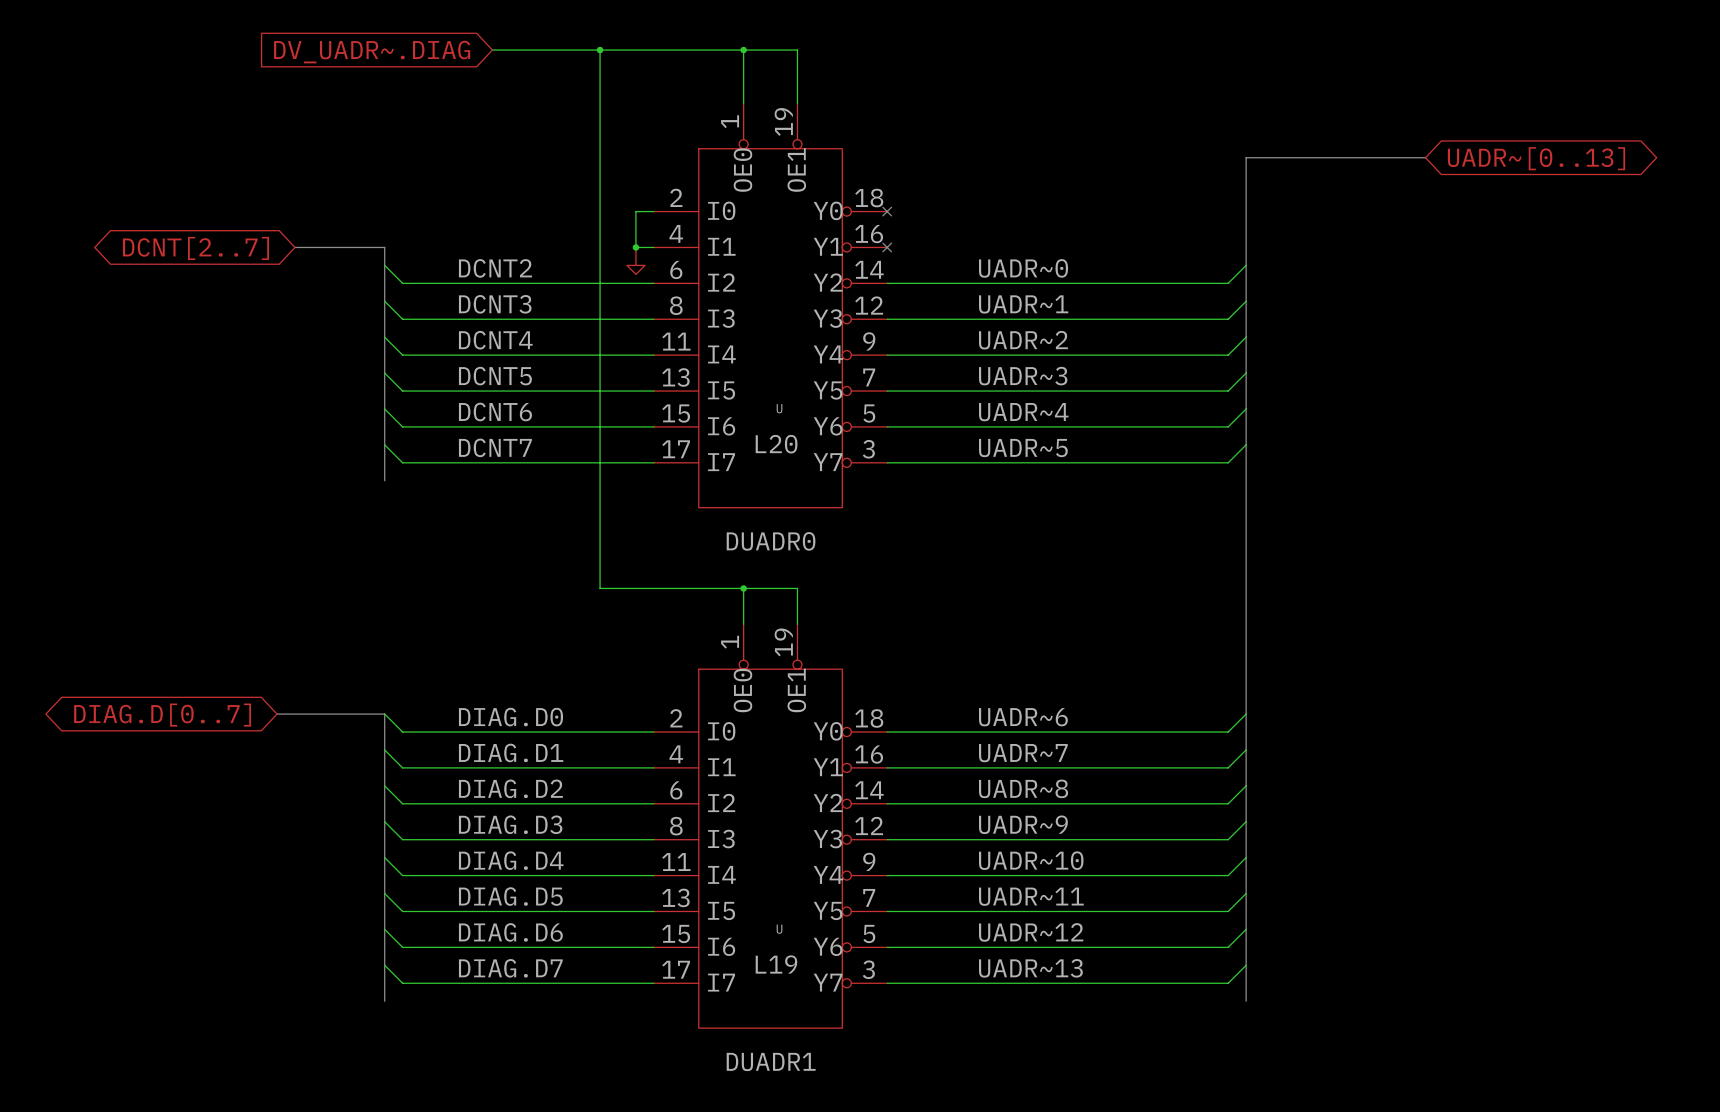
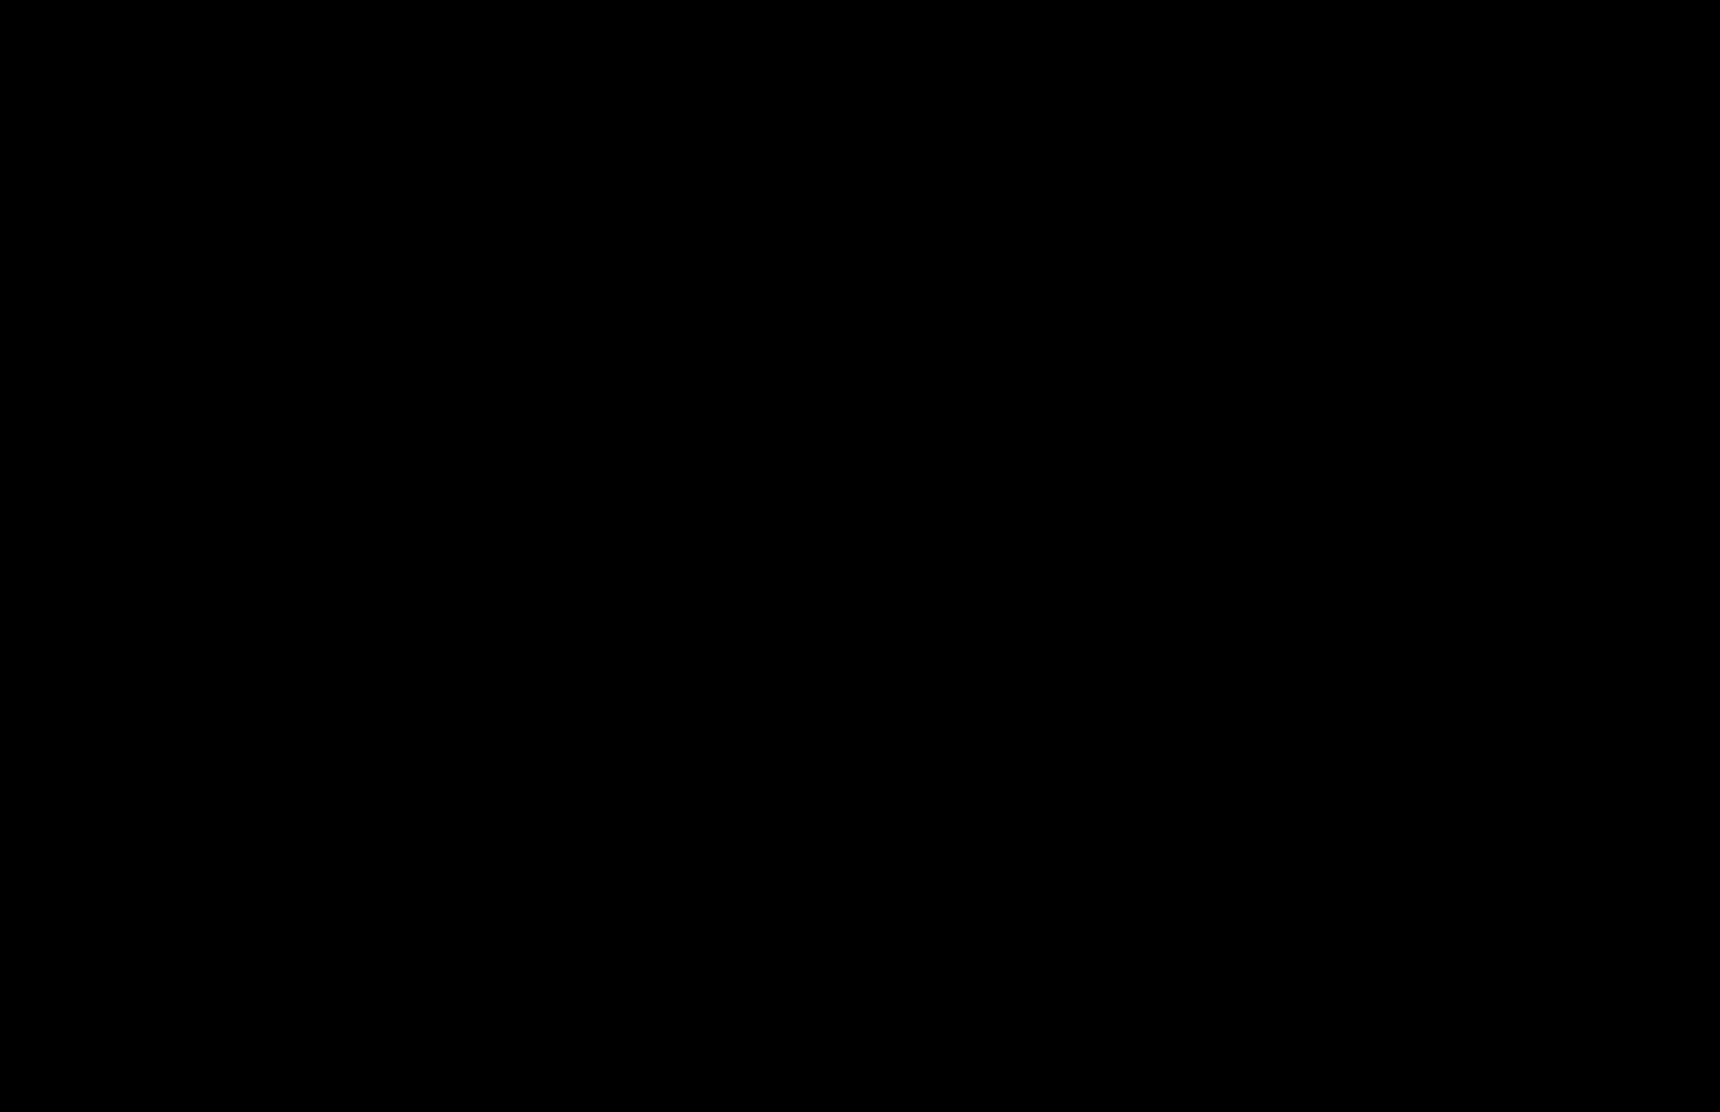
wire: (492, 50) (797, 50) (797, 103) -> none
wire: (600, 50) (600, 588) (797, 588) (797, 624) -> none
junction: (600, 50) -> none
wire: (743, 50) (743, 103) -> none
junction: (743, 50) -> none
global label: DV_UADR~.DIAG (372, 52) -> none
bus: (1425, 157) (1246, 157) (1246, 1001) -> none
global label: UADR~[0..13] (1536, 158) -> none
wire: (653, 211) (635, 211) (635, 247) (653, 247) -> none
no-connect mark: (887, 211) -> none
bus: (294, 247) (384, 247) (384, 480) -> none
junction: (635, 247) -> none
no-connect mark: (887, 247) -> none
global label: DCNT[2..7] (195, 248) -> none
power symbol: (635, 261) -> none
wire: (384, 265) (402, 283) (653, 283) -> none
wire: (1246, 265) (1228, 283) (887, 283) -> none
label: DCNT2 (495, 268) -> none
label: UADR~0 (1023, 268) -> none
wire: (384, 301) (402, 319) (653, 319) -> none
wire: (1246, 301) (1228, 319) (887, 319) -> none
label: DCNT3 (495, 304) -> none
label: UADR~1 (1023, 304) -> none
U: (770, 305) -> none
wire: (384, 337) (402, 355) (653, 355) -> none
wire: (1246, 337) (1228, 355) (887, 355) -> none
label: DCNT4 (495, 340) -> none
label: UADR~2 (1023, 340) -> none
wire: (384, 373) (402, 391) (653, 391) -> none
wire: (1246, 373) (1228, 391) (887, 391) -> none
label: DCNT5 (495, 376) -> none
label: UADR~3 (1023, 376) -> none
wire: (384, 408) (402, 426) (653, 426) -> none
wire: (1246, 408) (1228, 426) (887, 426) -> none
label: DCNT6 (495, 411) -> none
label: UADR~4 (1023, 412) -> none
wire: (384, 444) (402, 462) (653, 462) -> none
wire: (1246, 444) (1228, 462) (887, 462) -> none
label: DCNT7 (495, 447) -> none
label: UADR~5 (1023, 448) -> none
wire: (743, 588) (743, 624) -> none
junction: (743, 588) -> none
bus: (277, 714) (384, 714) (384, 1001) -> none
wire: (384, 714) (402, 732) (653, 732) -> none
wire: (1246, 714) (1228, 732) (887, 732) -> none
global label: DIAG.D[0..7] (162, 715) -> none
label: DIAG.D0 (510, 717) -> none
label: UADR~6 (1023, 717) -> none
wire: (384, 749) (402, 767) (653, 767) -> none
wire: (1246, 749) (1228, 767) (887, 767) -> none
label: DIAG.D1 (511, 752) -> none
label: UADR~7 (1023, 753) -> none
wire: (384, 785) (402, 803) (653, 803) -> none
wire: (1246, 785) (1228, 803) (887, 803) -> none
label: DIAG.D2 (510, 788) -> none
label: UADR~8 (1023, 788) -> none
wire: (384, 821) (402, 839) (653, 839) -> none
wire: (1246, 821) (1228, 839) (887, 839) -> none
label: DIAG.D3 (510, 824) -> none
label: UADR~9 (1023, 824) -> none
U: (770, 826) -> none
wire: (384, 857) (402, 875) (653, 875) -> none
wire: (1246, 857) (1228, 875) (887, 875) -> none
label: DIAG.D4 (511, 860) -> none
label: UADR~10 (1031, 860) -> none
wire: (384, 893) (402, 911) (653, 911) -> none
wire: (1246, 893) (1228, 911) (887, 911) -> none
label: DIAG.D5 (510, 896) -> none
label: UADR~11 (1031, 896) -> none
wire: (384, 929) (402, 947) (653, 947) -> none
wire: (1246, 929) (1228, 947) (887, 947) -> none
label: DIAG.D6 (510, 932) -> none
label: UADR~12 (1031, 932) -> none
wire: (384, 965) (402, 983) (653, 983) -> none
wire: (1246, 965) (1228, 983) (887, 983) -> none
label: DIAG.D7 (510, 968) -> none
label: UADR~13 (1030, 968) -> none

